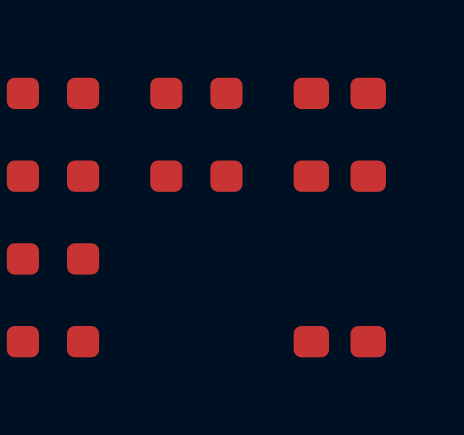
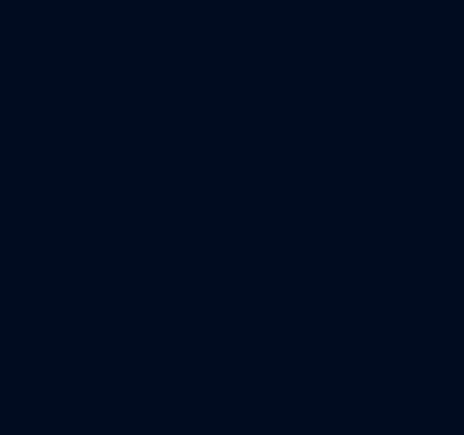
part: (52, 93) -> none
part: (196, 93) -> none
part: (339, 93) -> none
part: (52, 176) -> none
part: (196, 176) -> none
part: (339, 176) -> none
part: (52, 258) -> none
part: (52, 341) -> none
part: (339, 341) -> none

